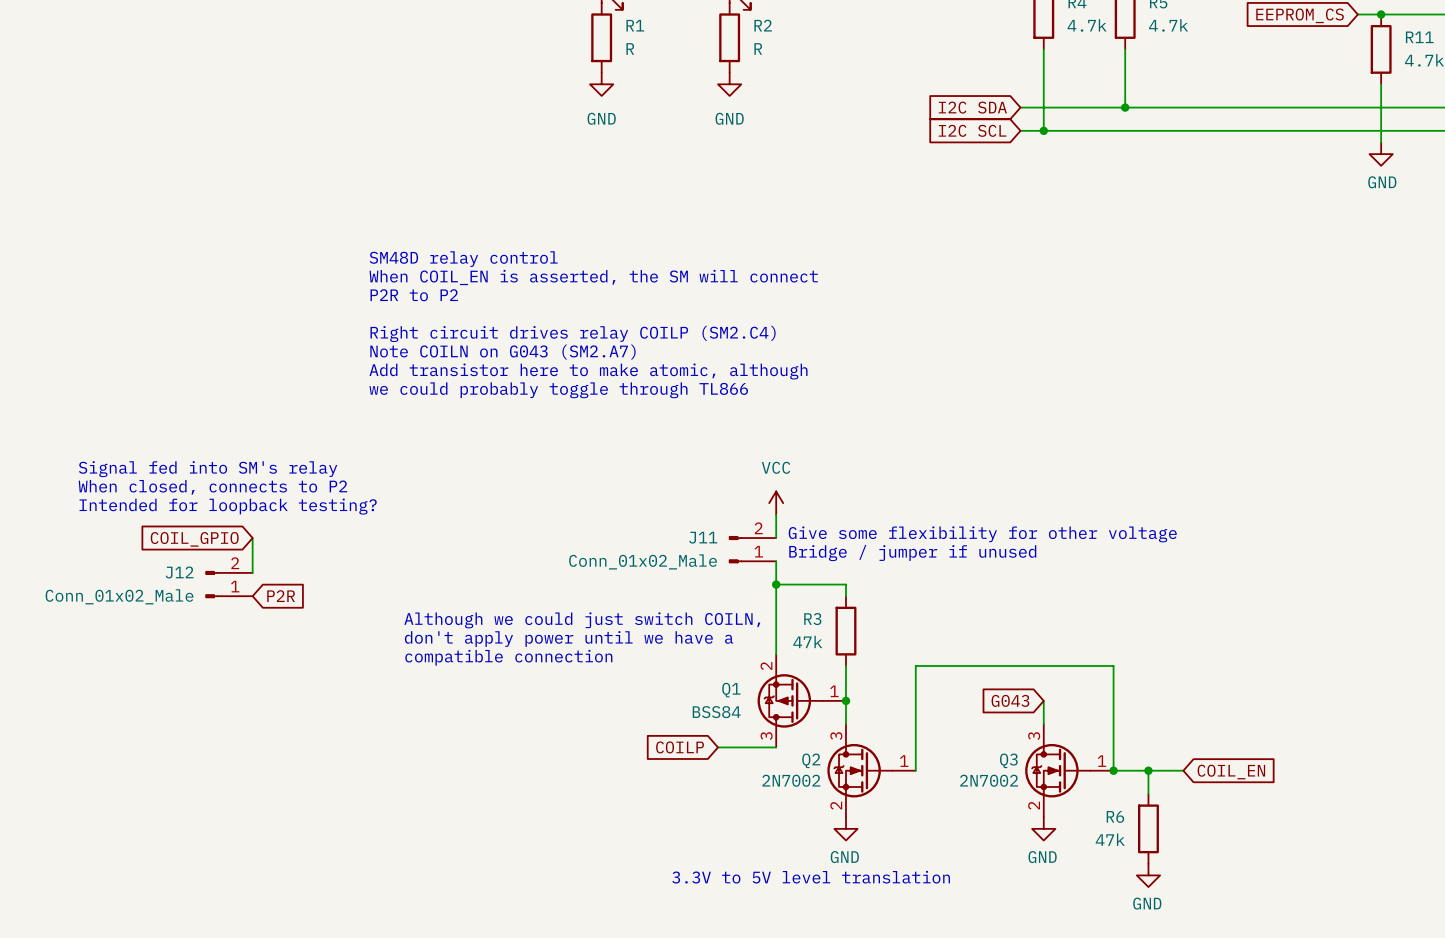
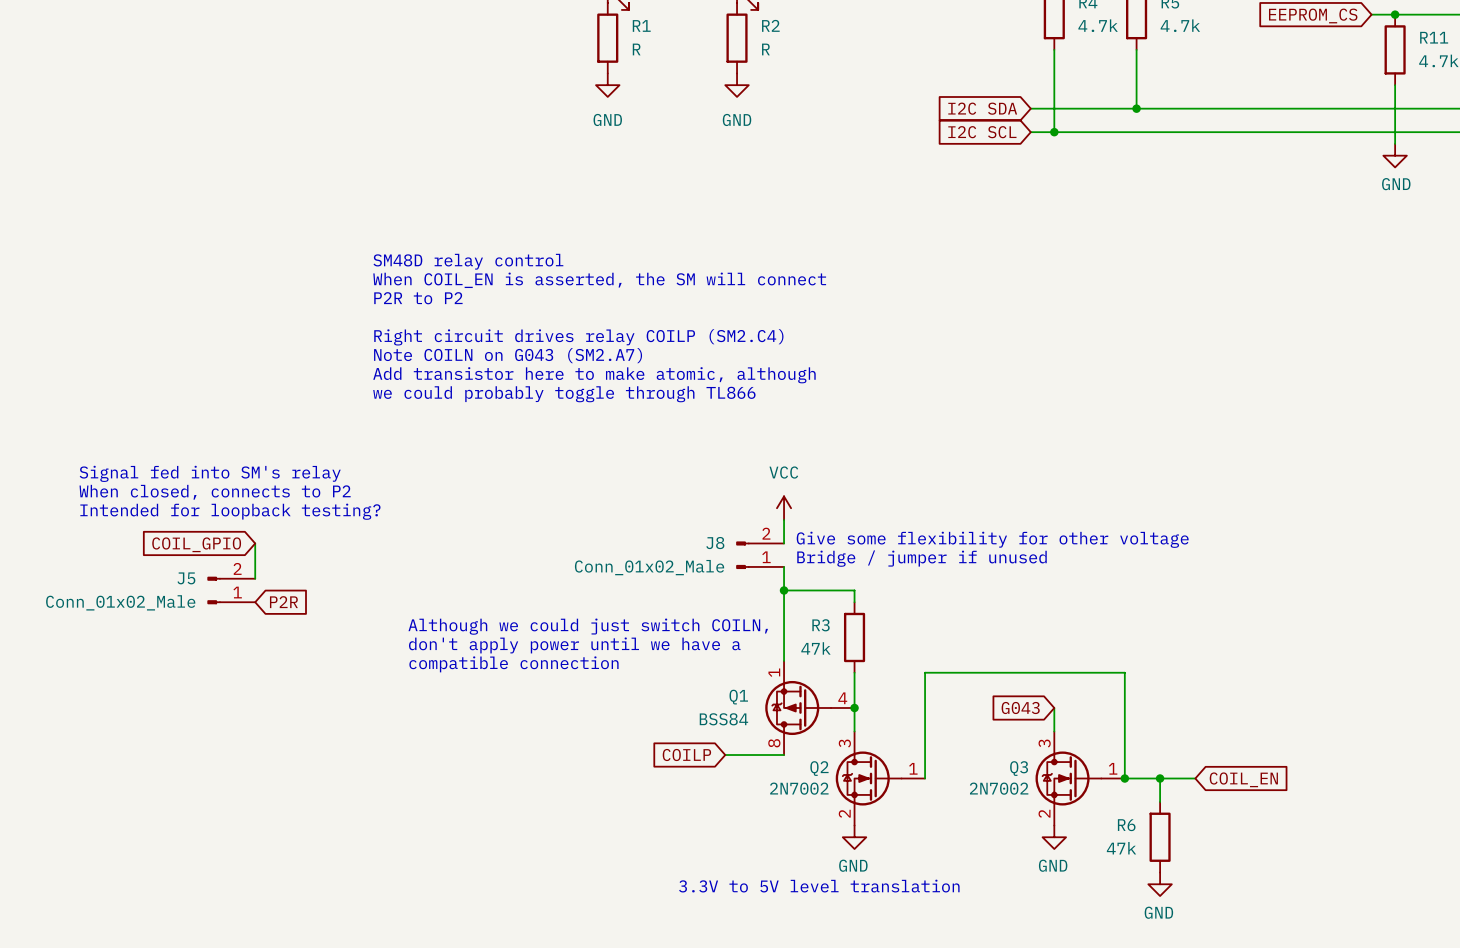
J11 name: J11 (703, 537) -> J8 (715, 543)
J12 name: J12 (179, 572) -> J5 (186, 578)
Q1 pin number: 2 (766, 665) -> 1 (774, 672)
Q1 pin number: 1 (834, 691) -> 4 (842, 698)
Q1 pin number: 3 (766, 736) -> 8 (774, 743)

